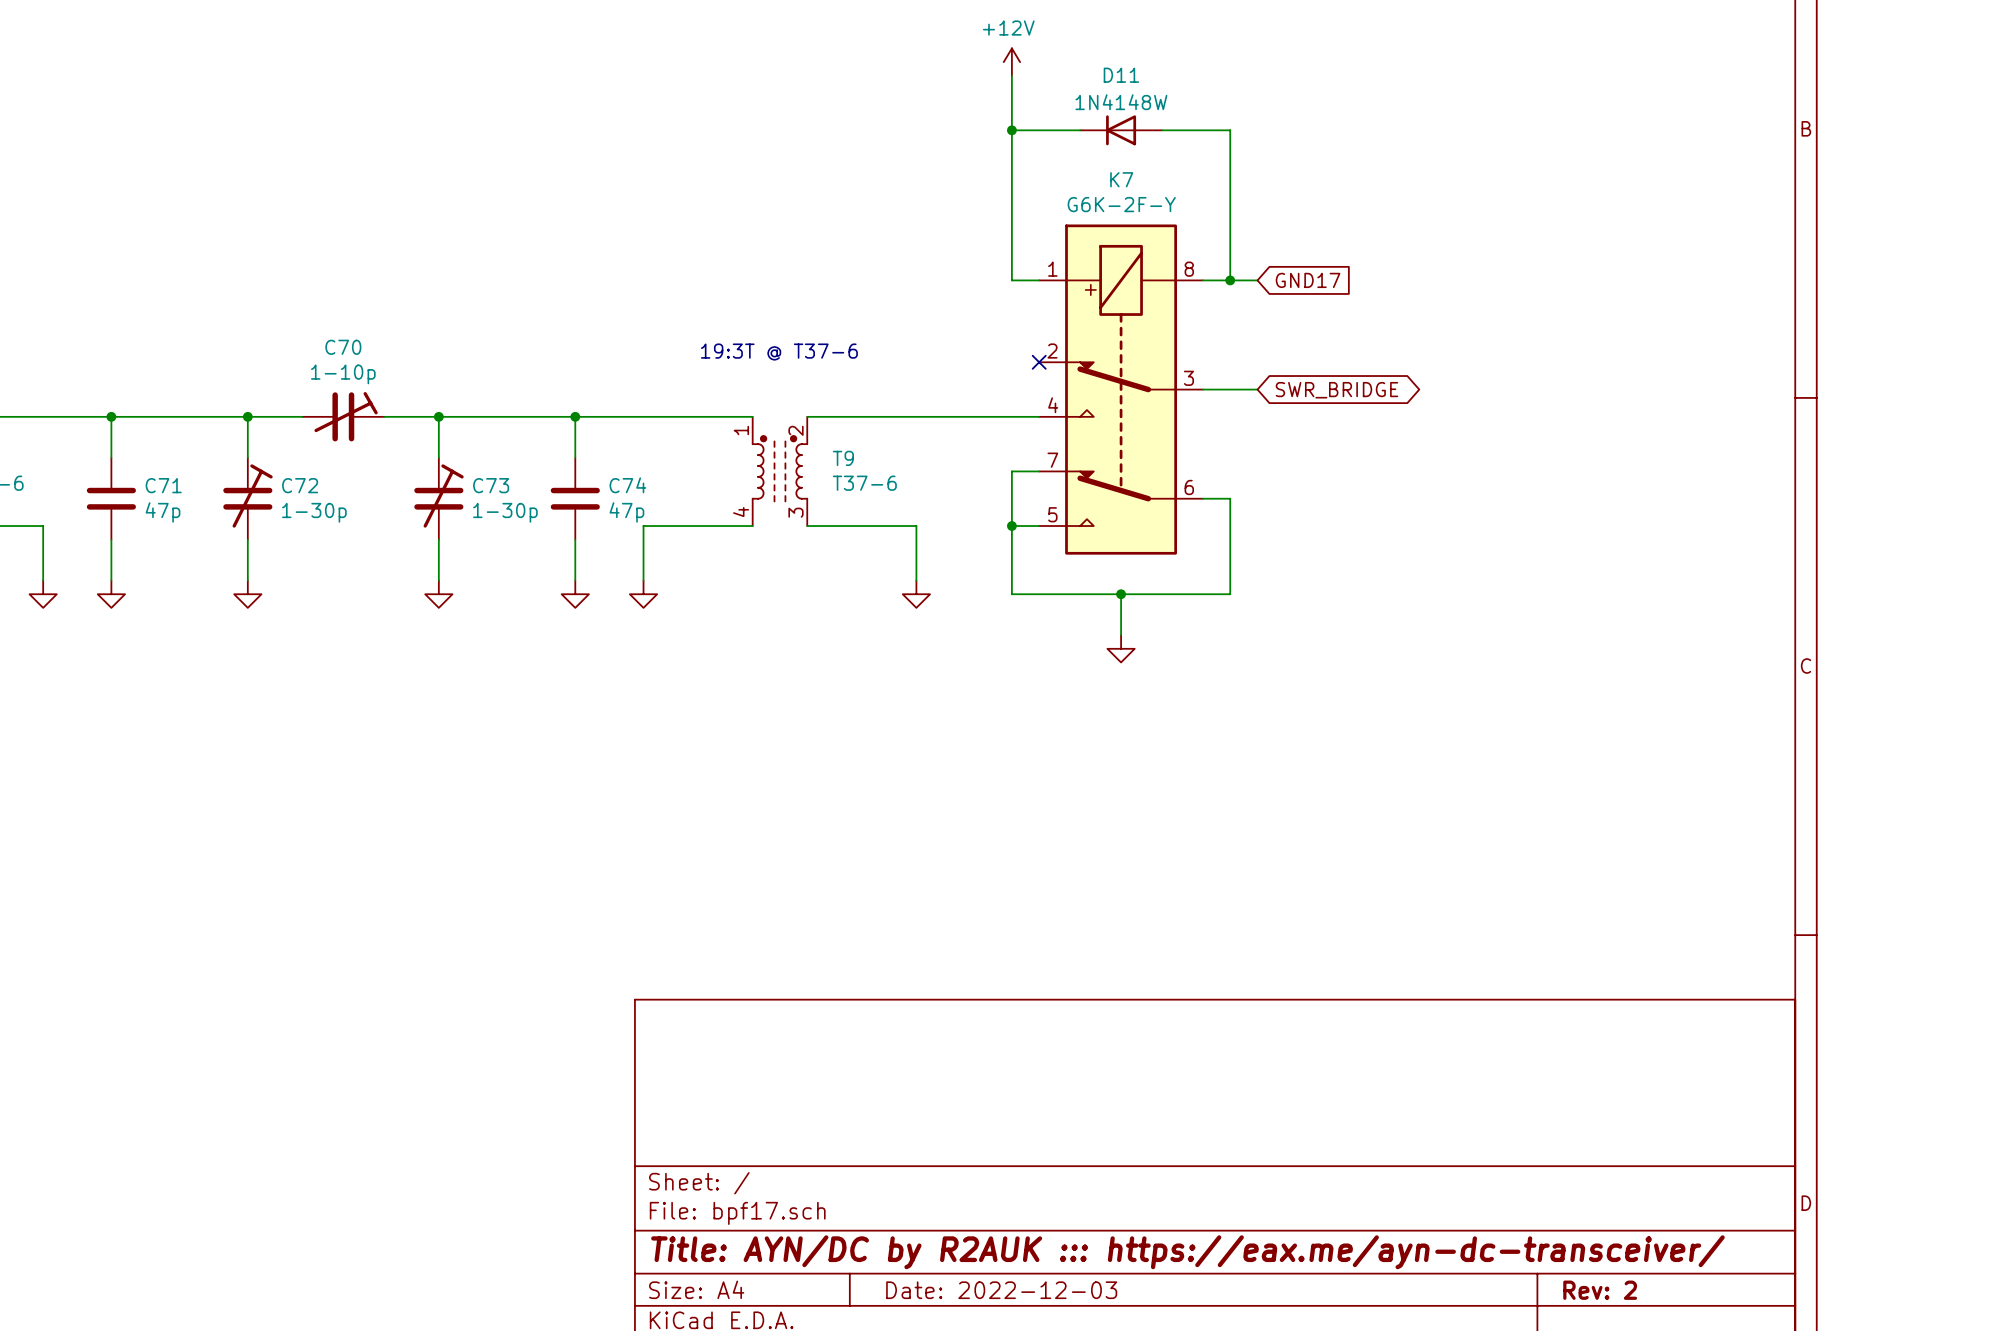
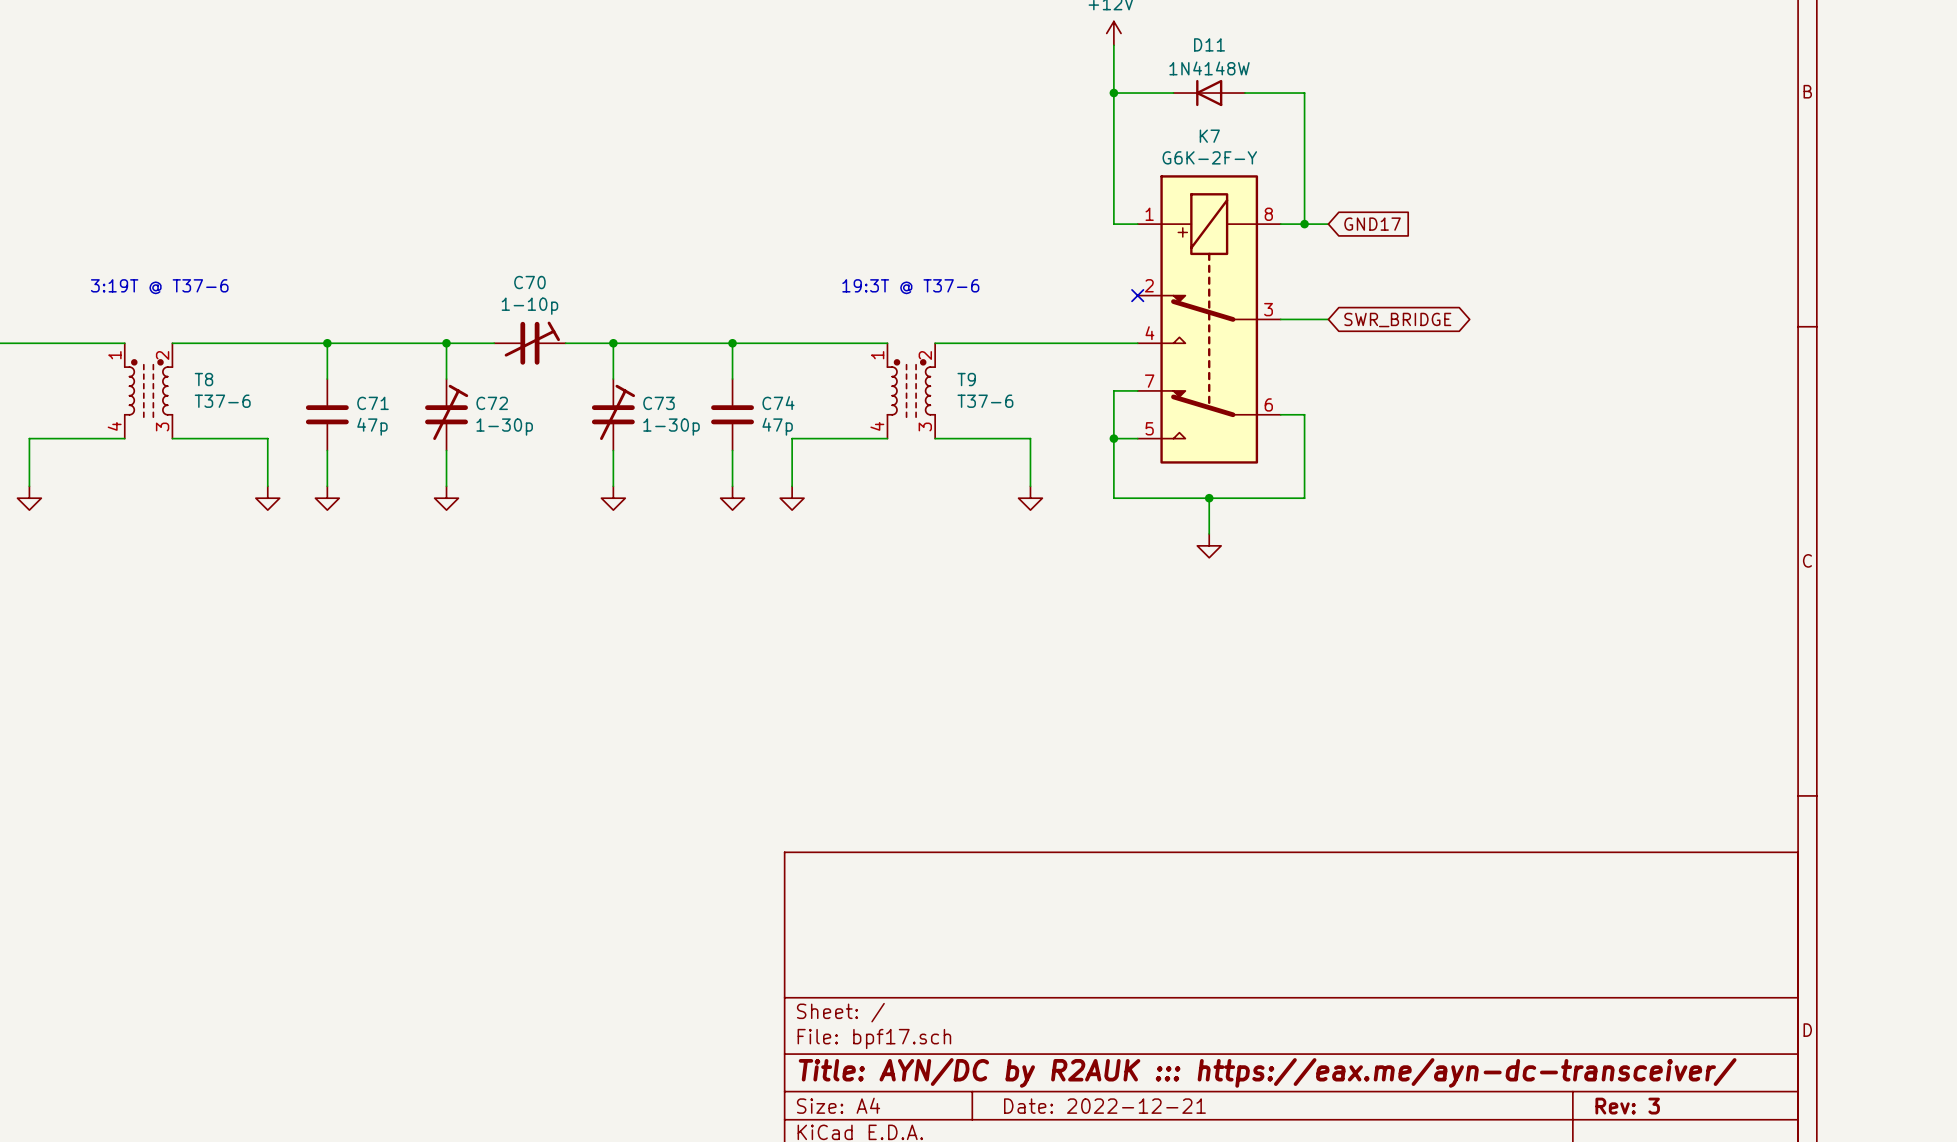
title block: Date: 2022-12-03 (1001, 1290) -> Date: 2022-12-21 (1104, 1106)
title block: Rev: 2 (1600, 1290) -> Rev: 3 (1627, 1106)

